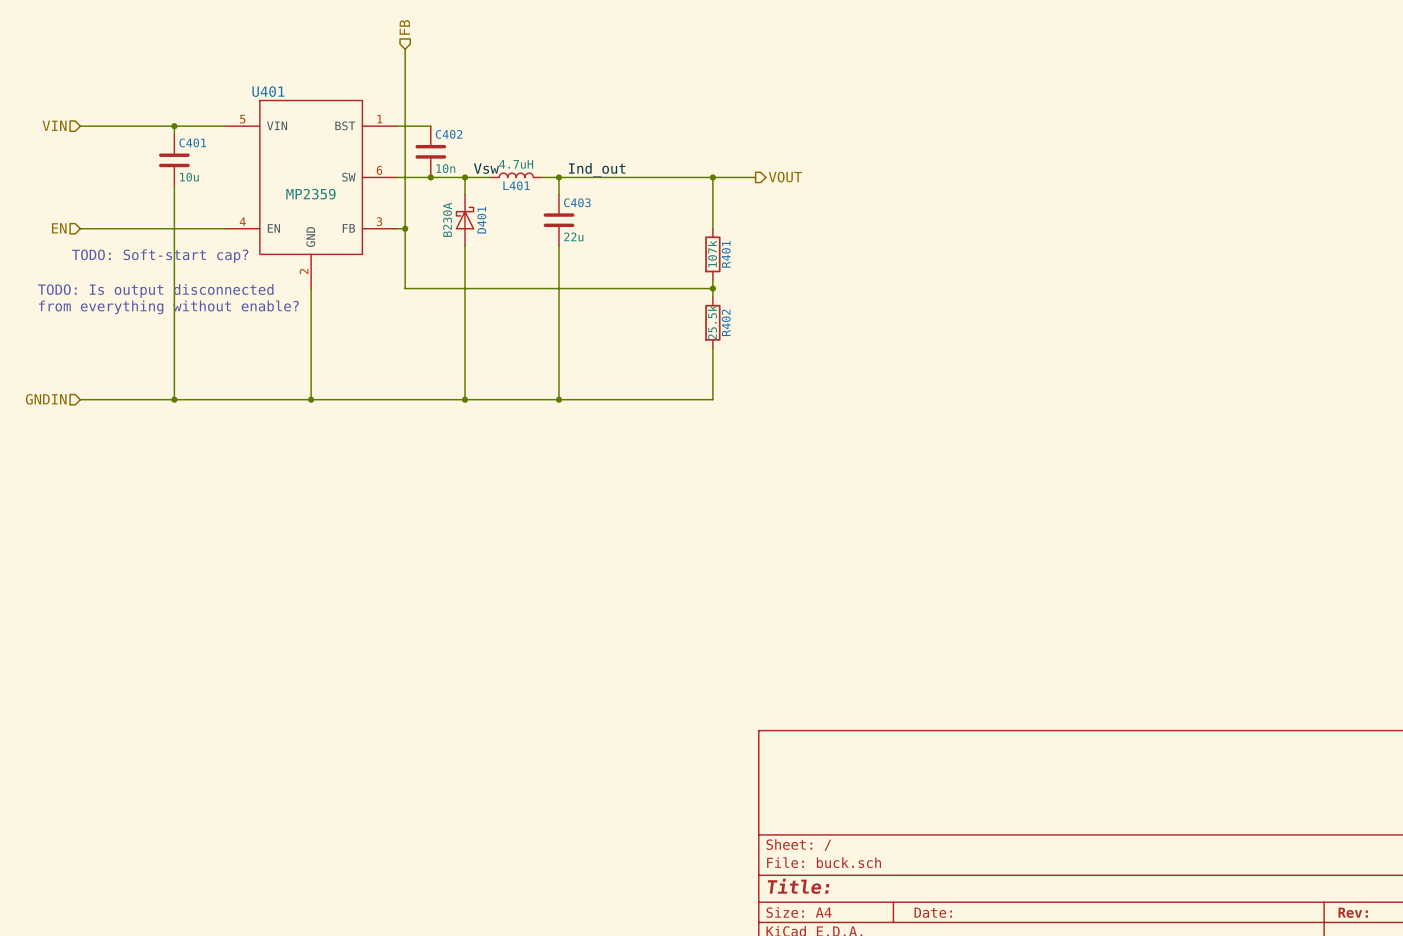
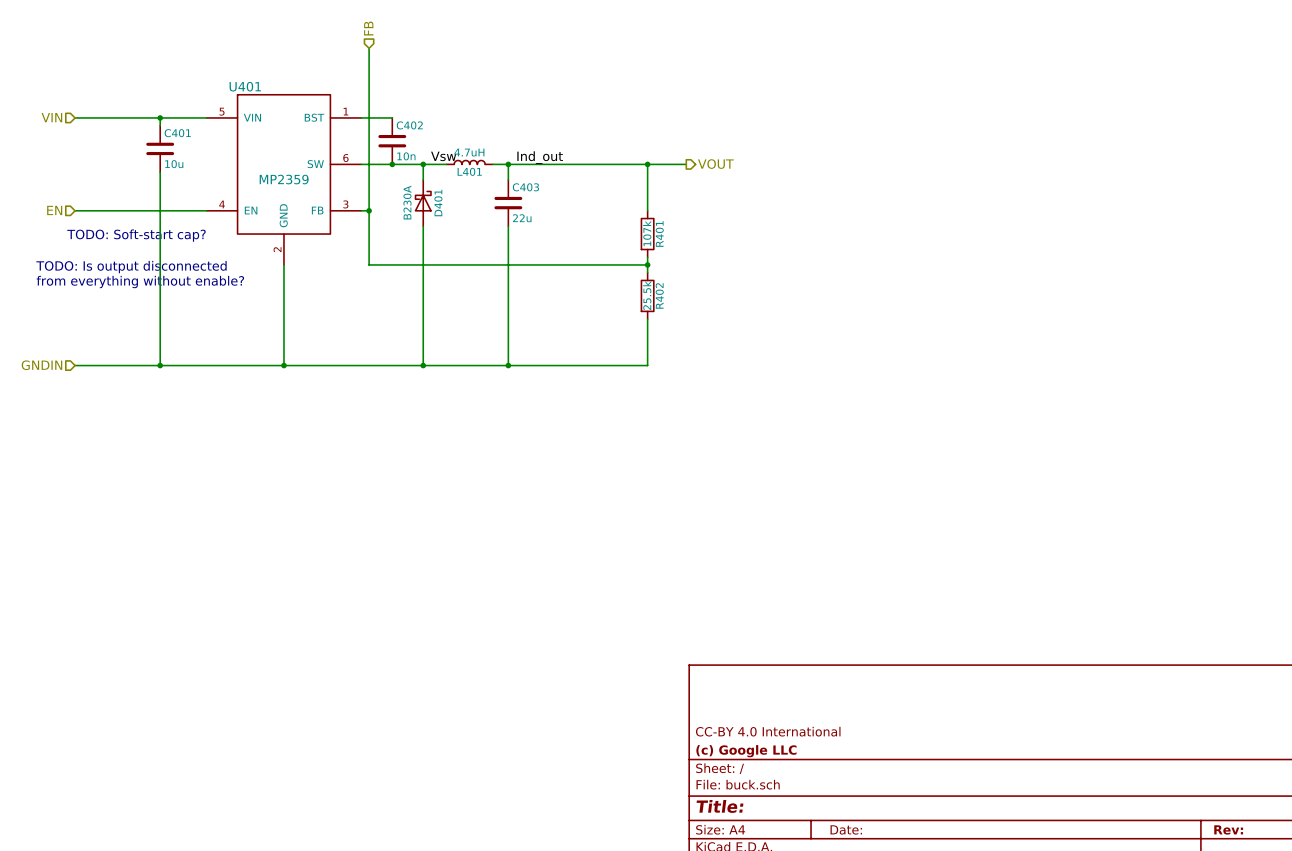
title block: none -> CC-BY 4.0 International (768, 731)
title block: none -> (c) Google LLC (746, 751)

